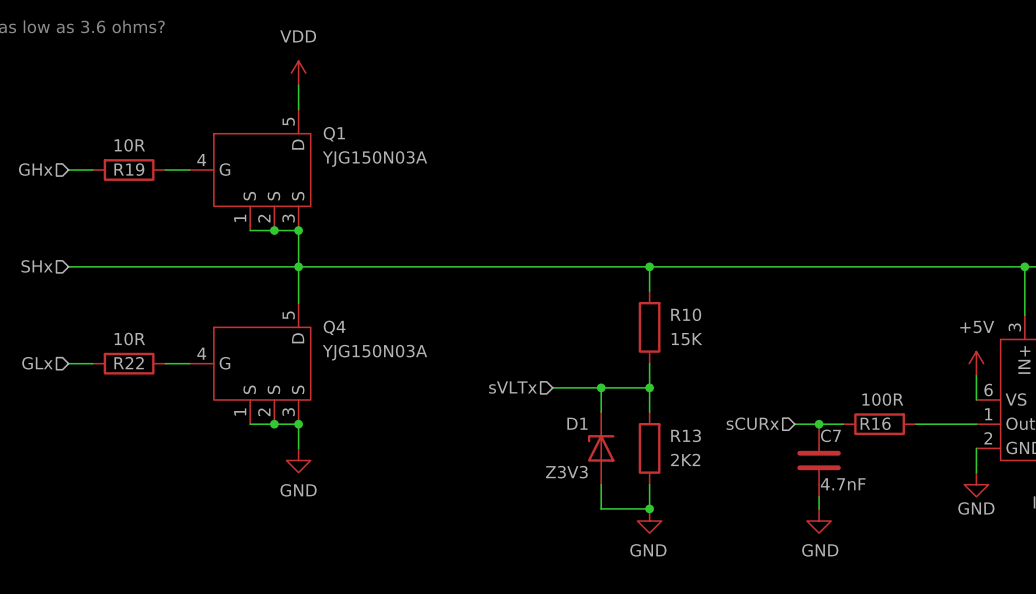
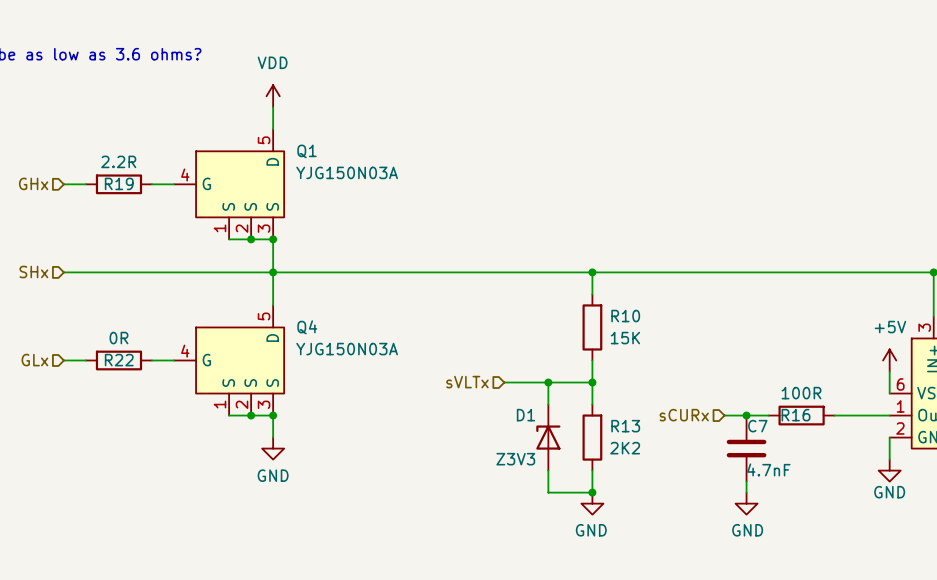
R19 value: 10R (129, 145) -> 2.2R (118, 161)
R22 value: 10R (129, 339) -> 0R (118, 338)

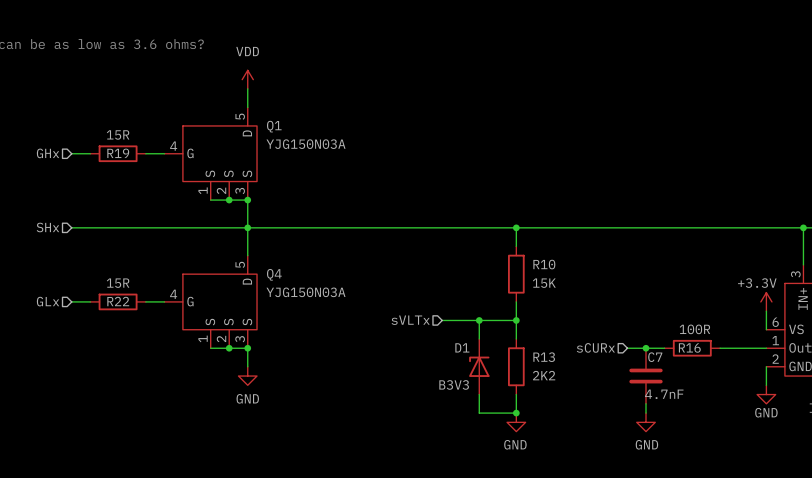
R19 value: 2.2R (118, 161) -> 15R (118, 134)
R22 value: 0R (118, 338) -> 15R (118, 283)
power symbol: +5V (889, 360) -> +3.3V (766, 301)
D1 value: Z3V3 (515, 459) -> B3V3 (454, 384)

